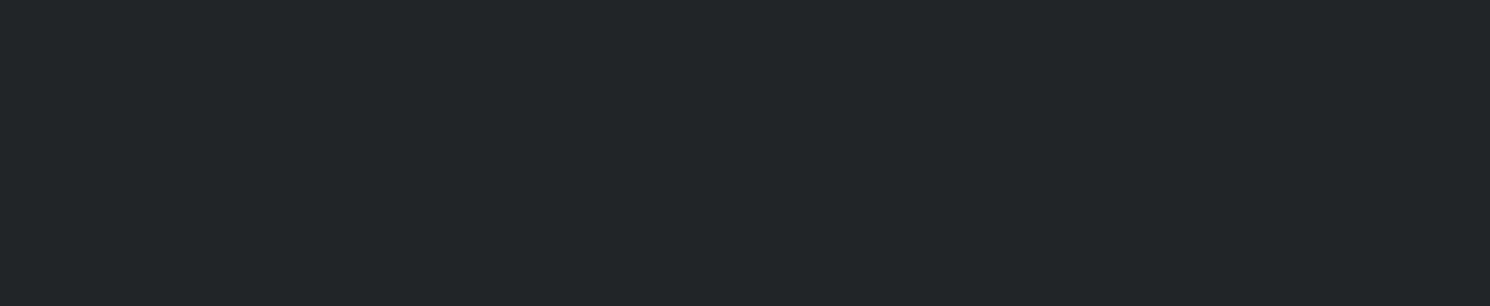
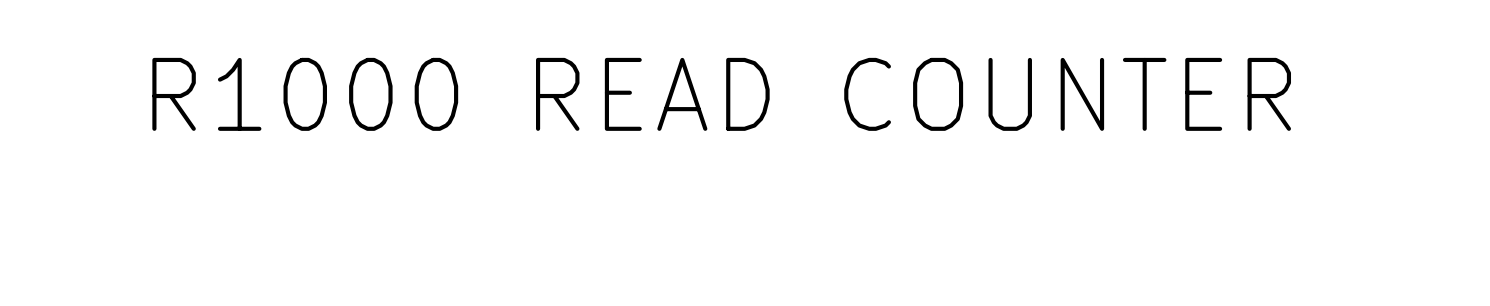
text: none -> R1000 READ COUNTER (721, 94)

